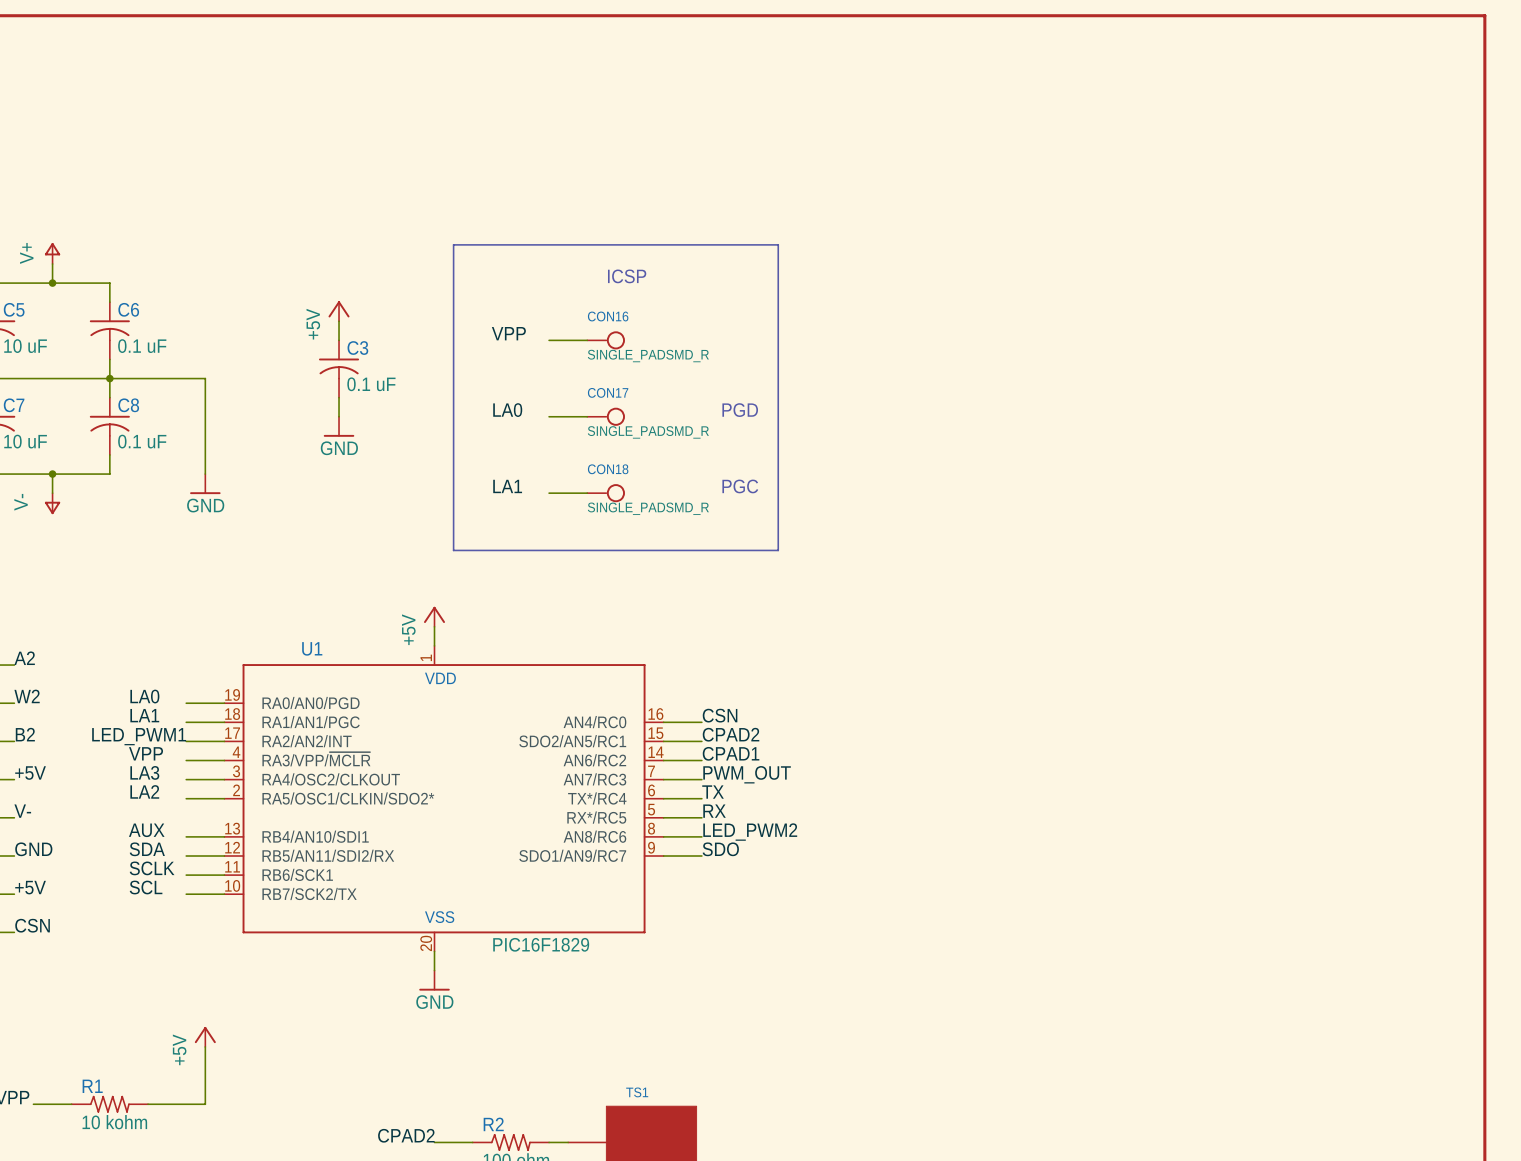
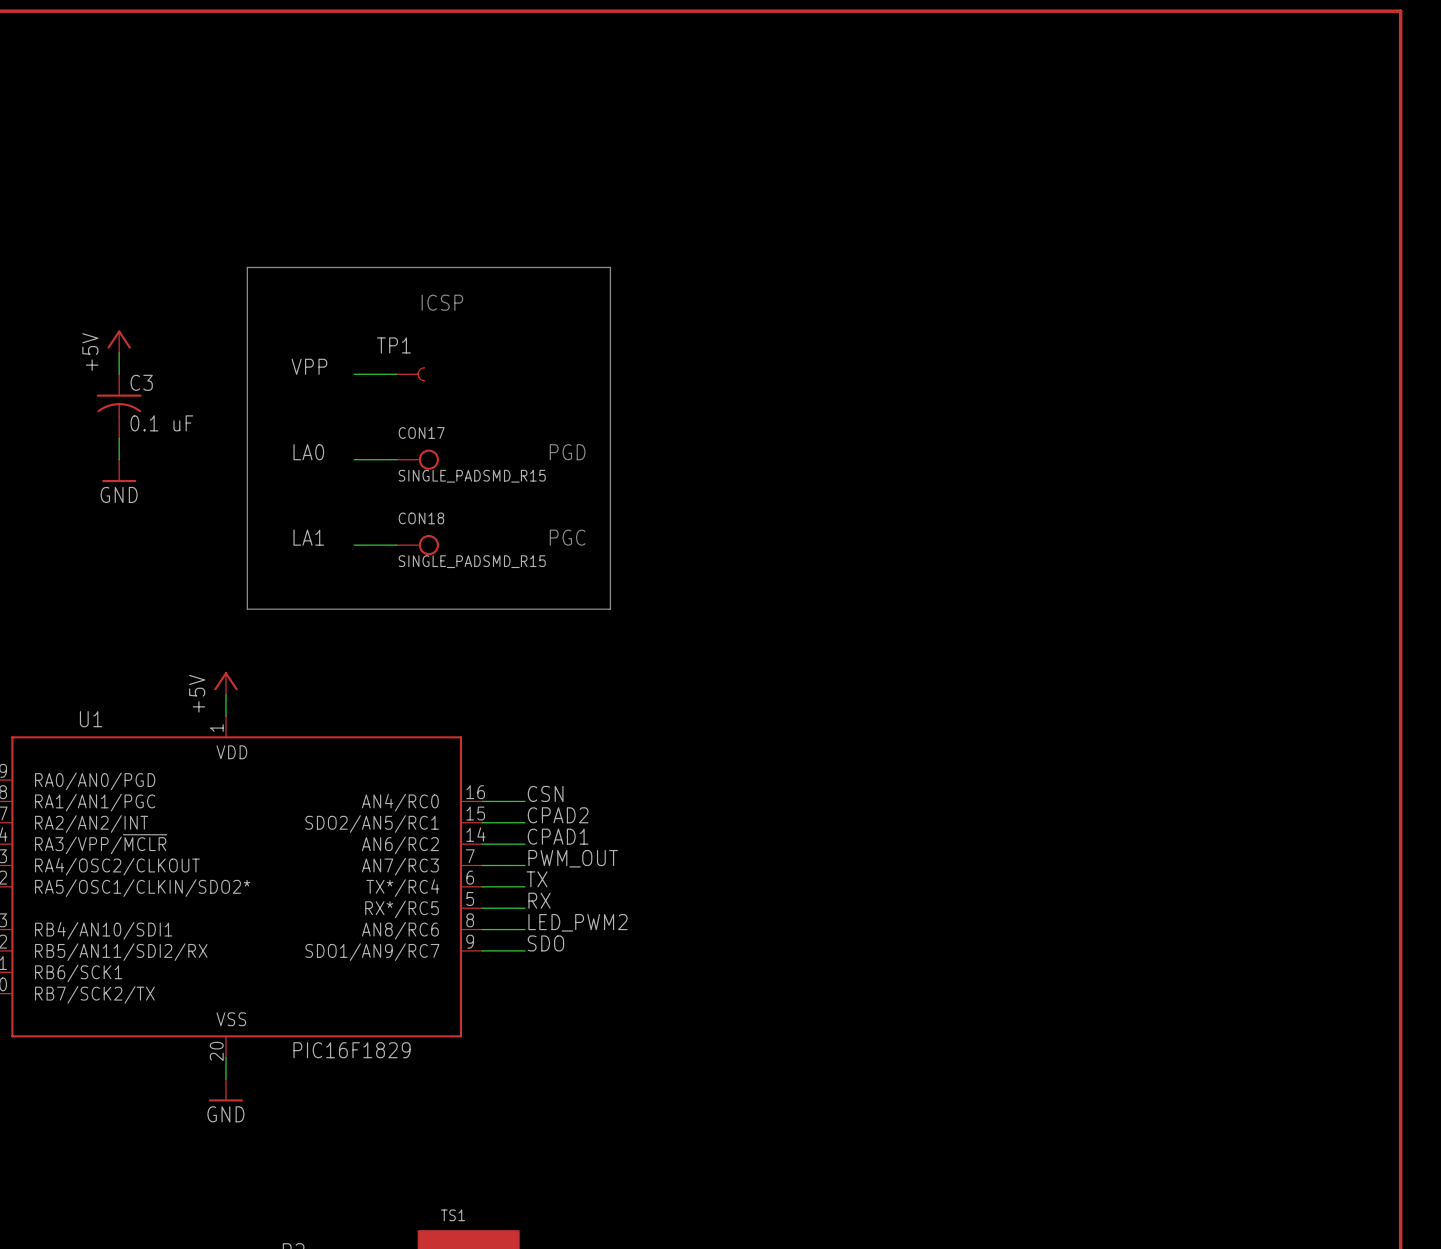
TP1: none -> (410, 374)
CON16: SINGLE_PADSMD_R (606, 340) -> none
CON17 value: SINGLE_PADSMD_R (648, 432) -> SINGLE_PADSMD_R15 (472, 476)
CON18 value: SINGLE_PADSMD_R (648, 508) -> SINGLE_PADSMD_R15 (472, 561)

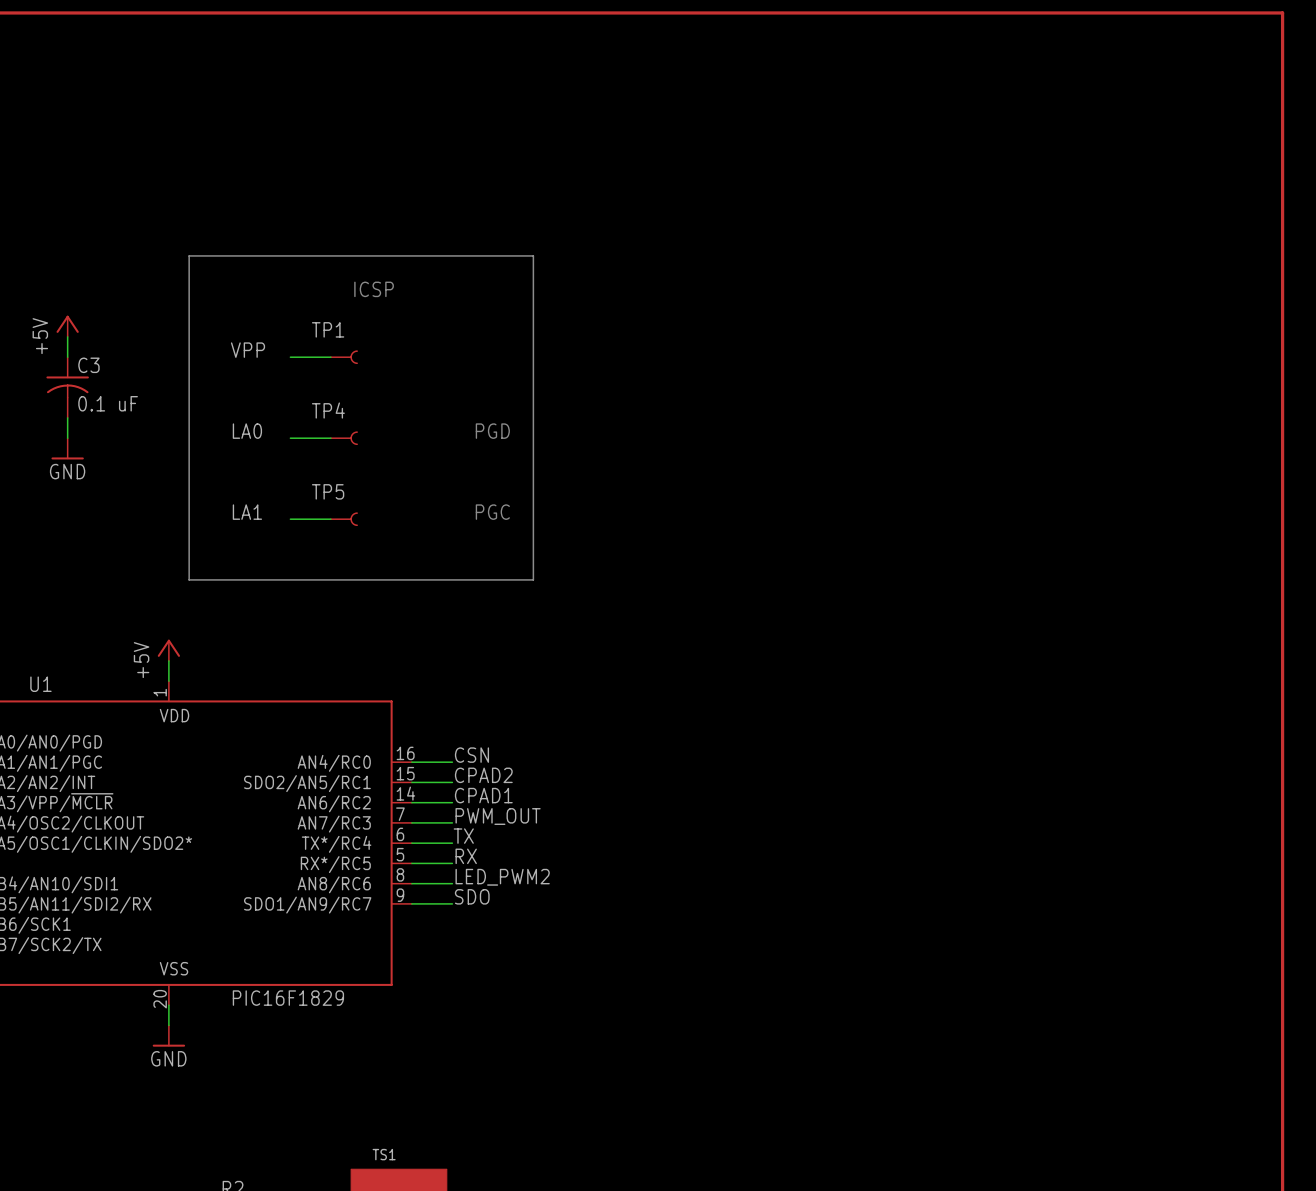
TP4: none -> (344, 438)
CON17: SINGLE_PADSMD_R15 (417, 459) -> none
TP5: none -> (344, 519)
CON18: SINGLE_PADSMD_R15 (417, 545) -> none

